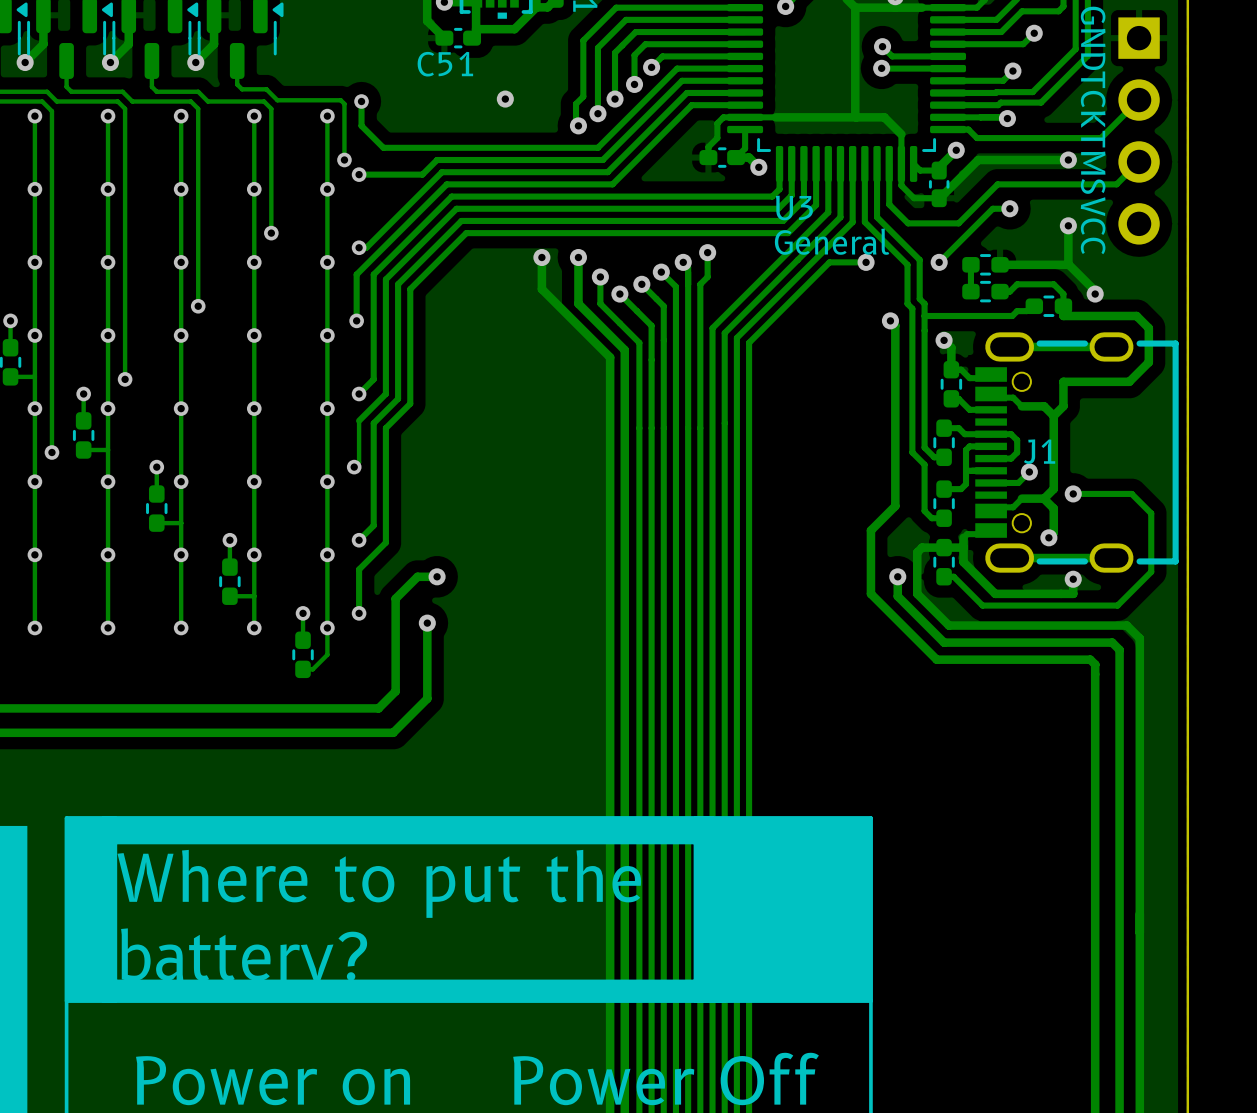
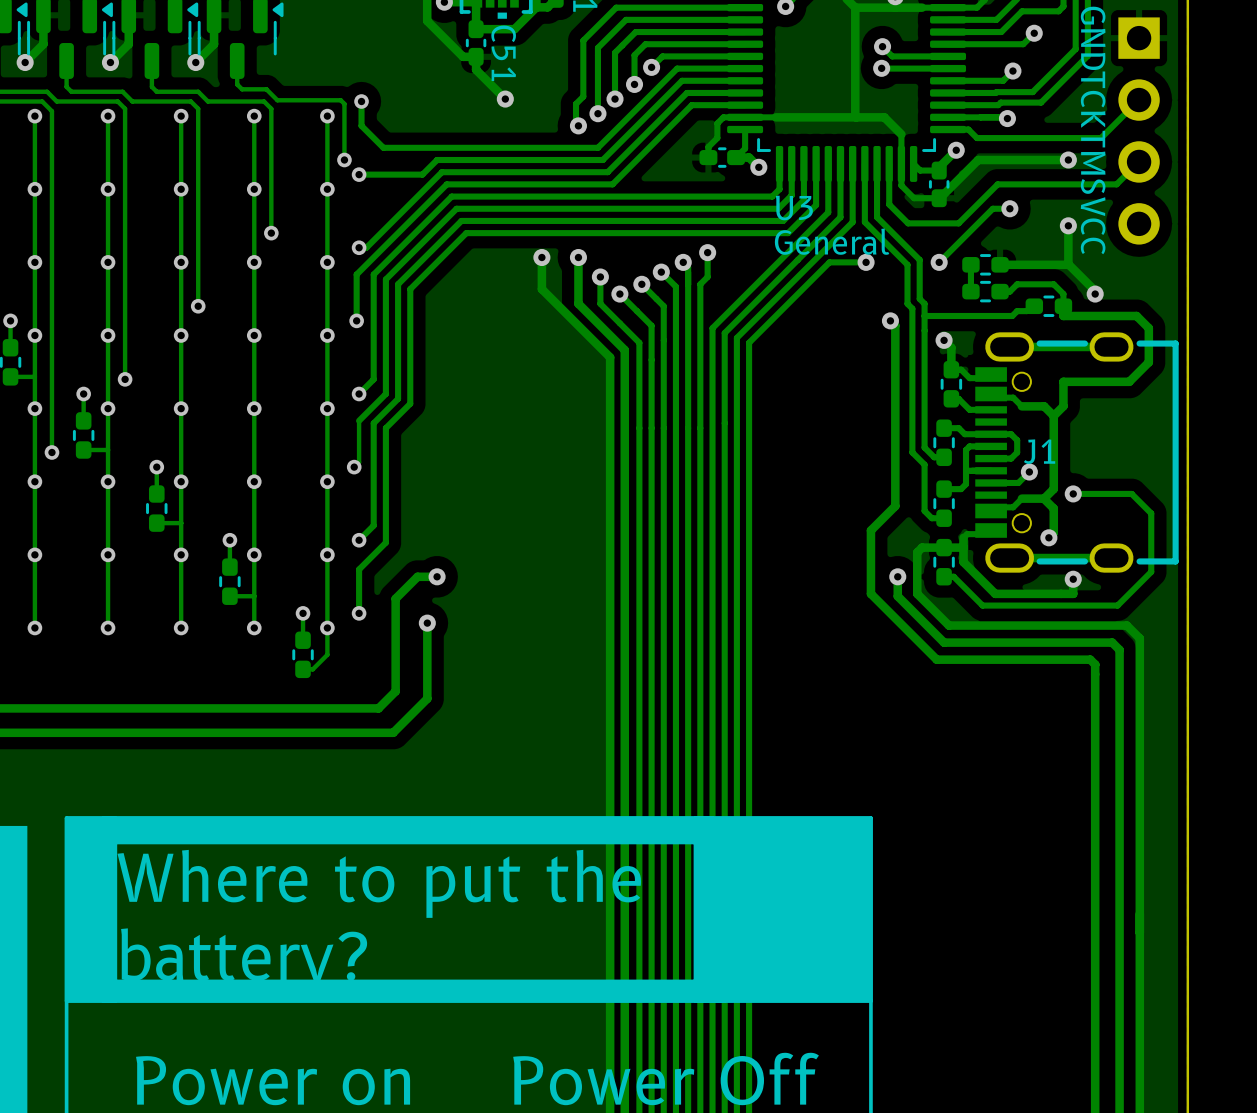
track: none -> (444, 38) (463, 56) (476, 56) (476, 69) (505, 99)
C51 rotation: 0° (458, 38) -> 90° clockwise (476, 43)

